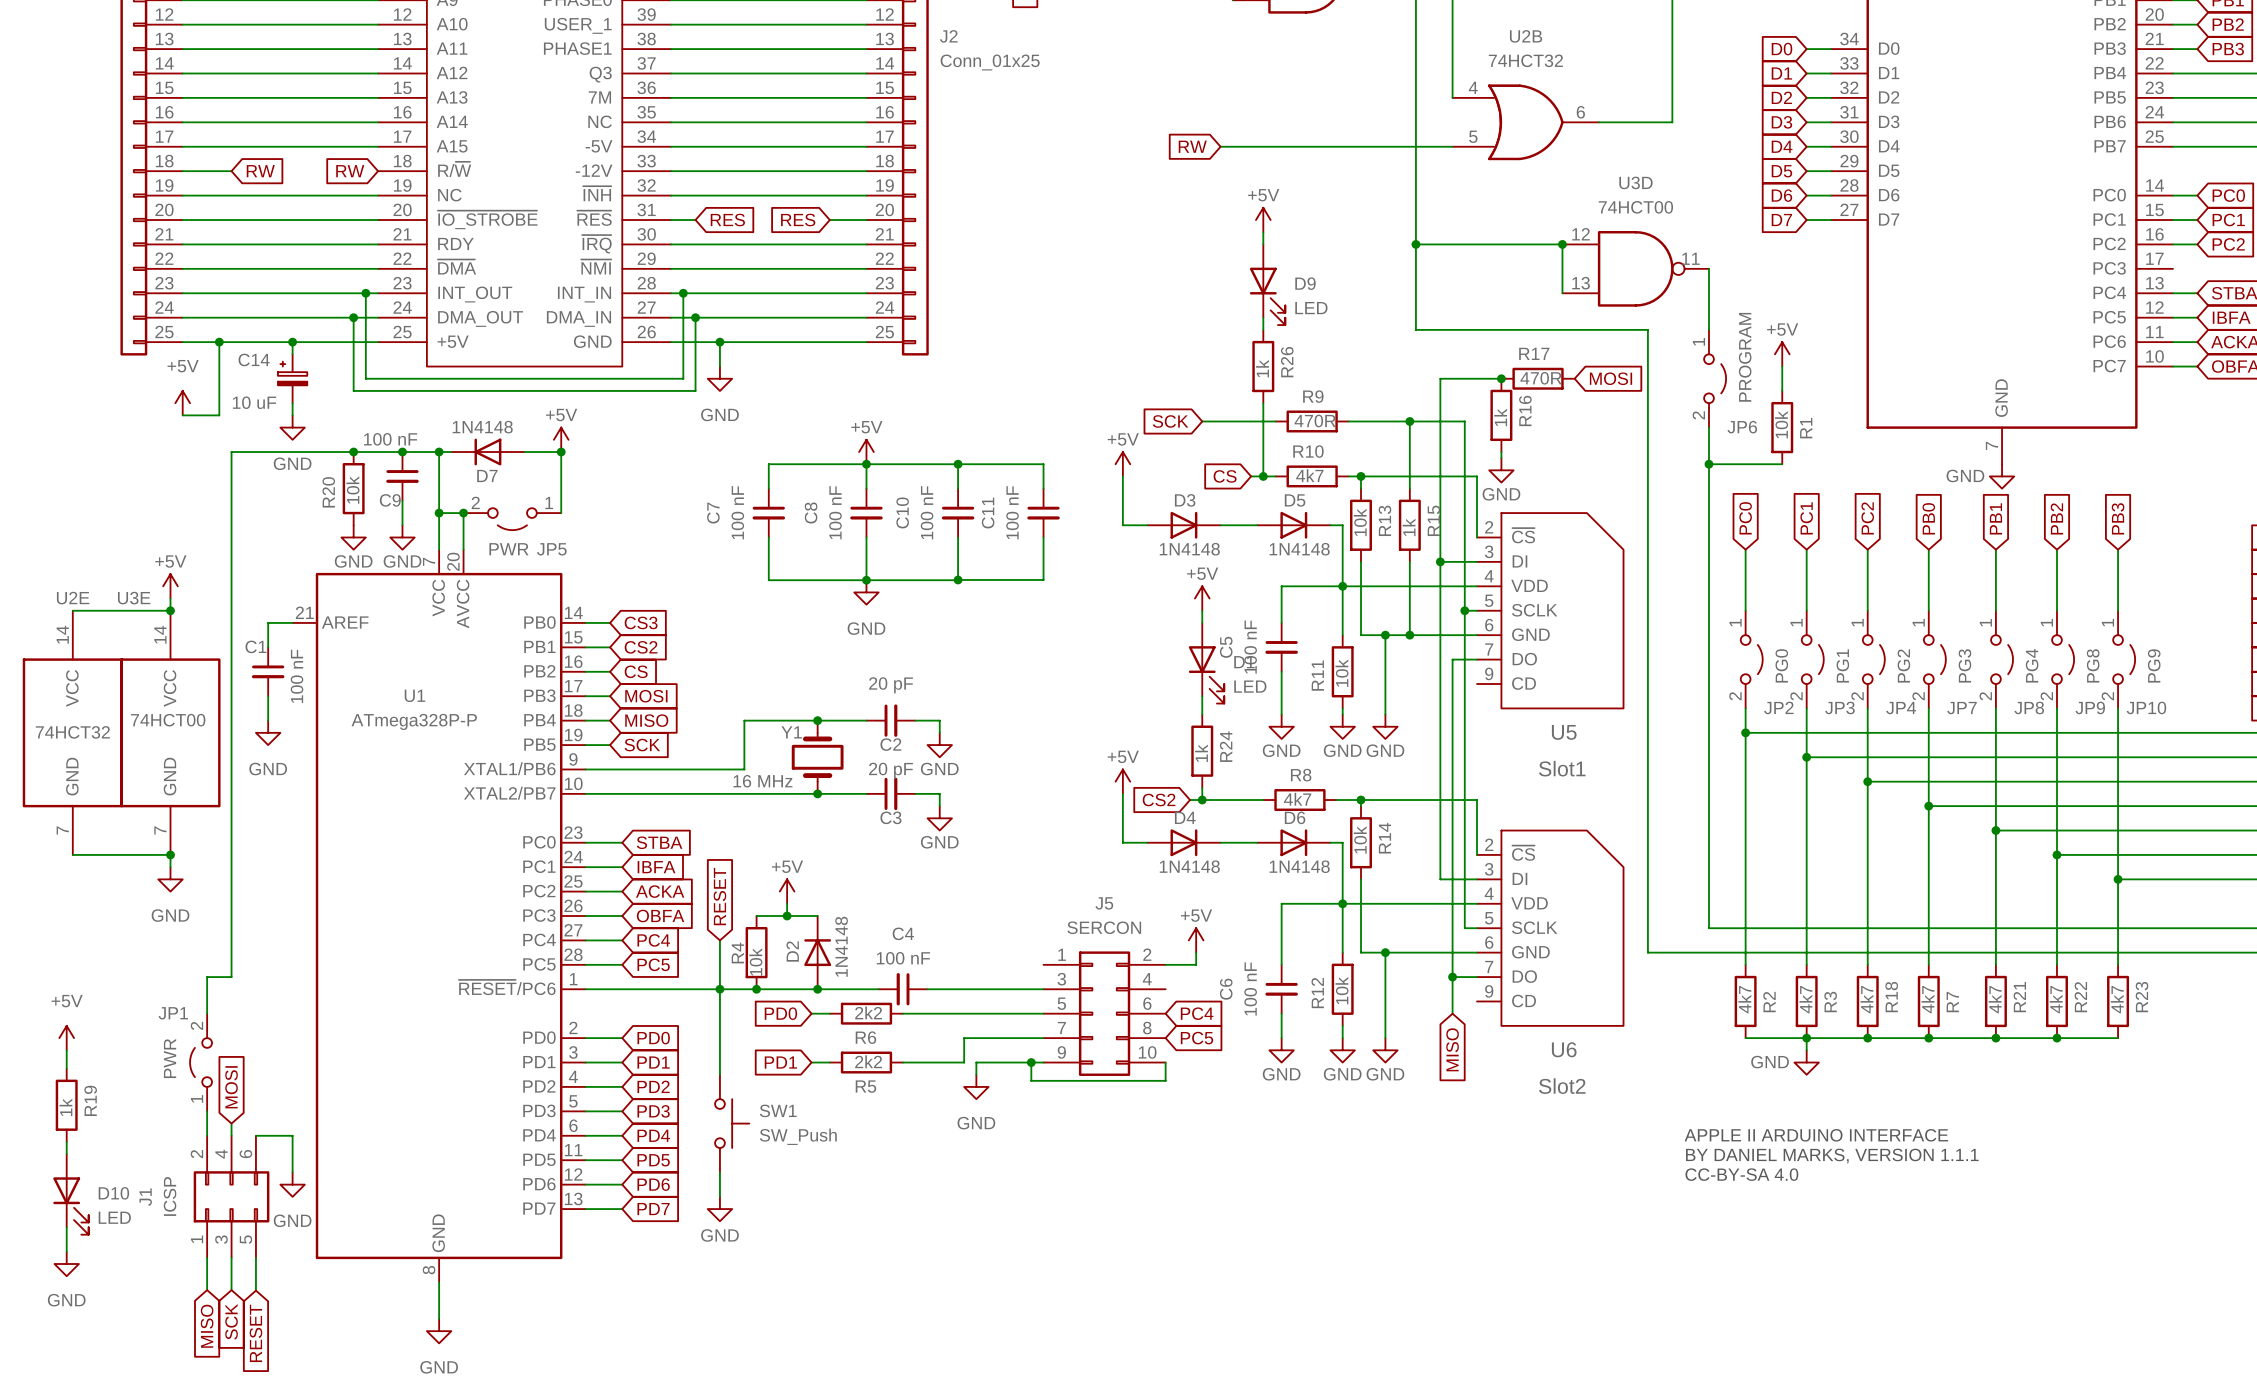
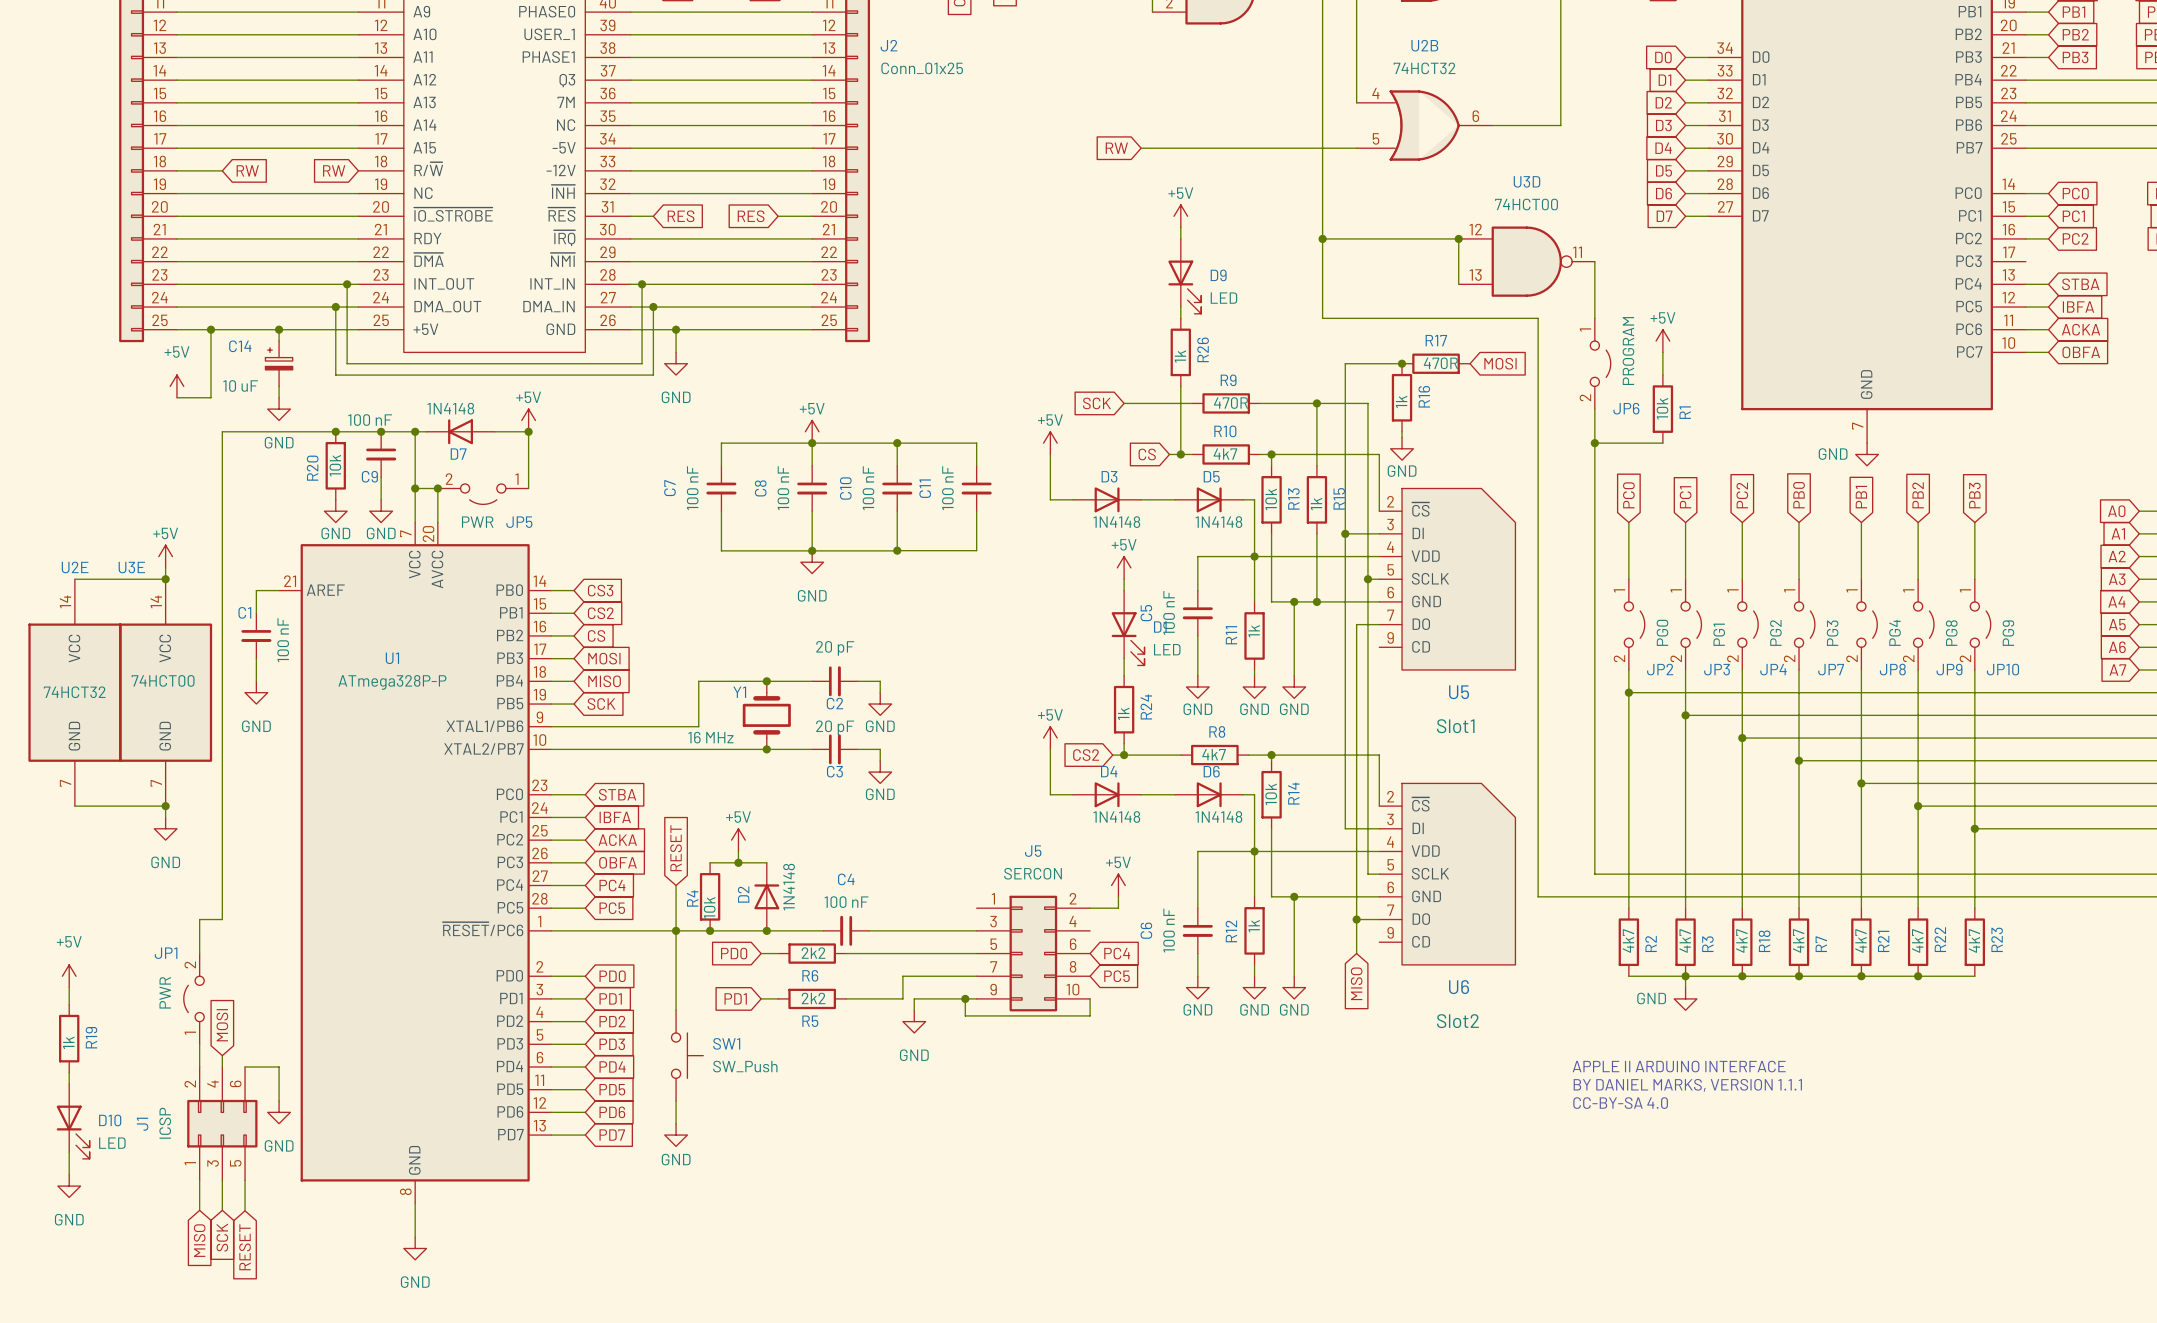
R11 value: 10k (1341, 673) -> 1k (1254, 631)
R12 value: 10k (1341, 990) -> 1k (1254, 926)

